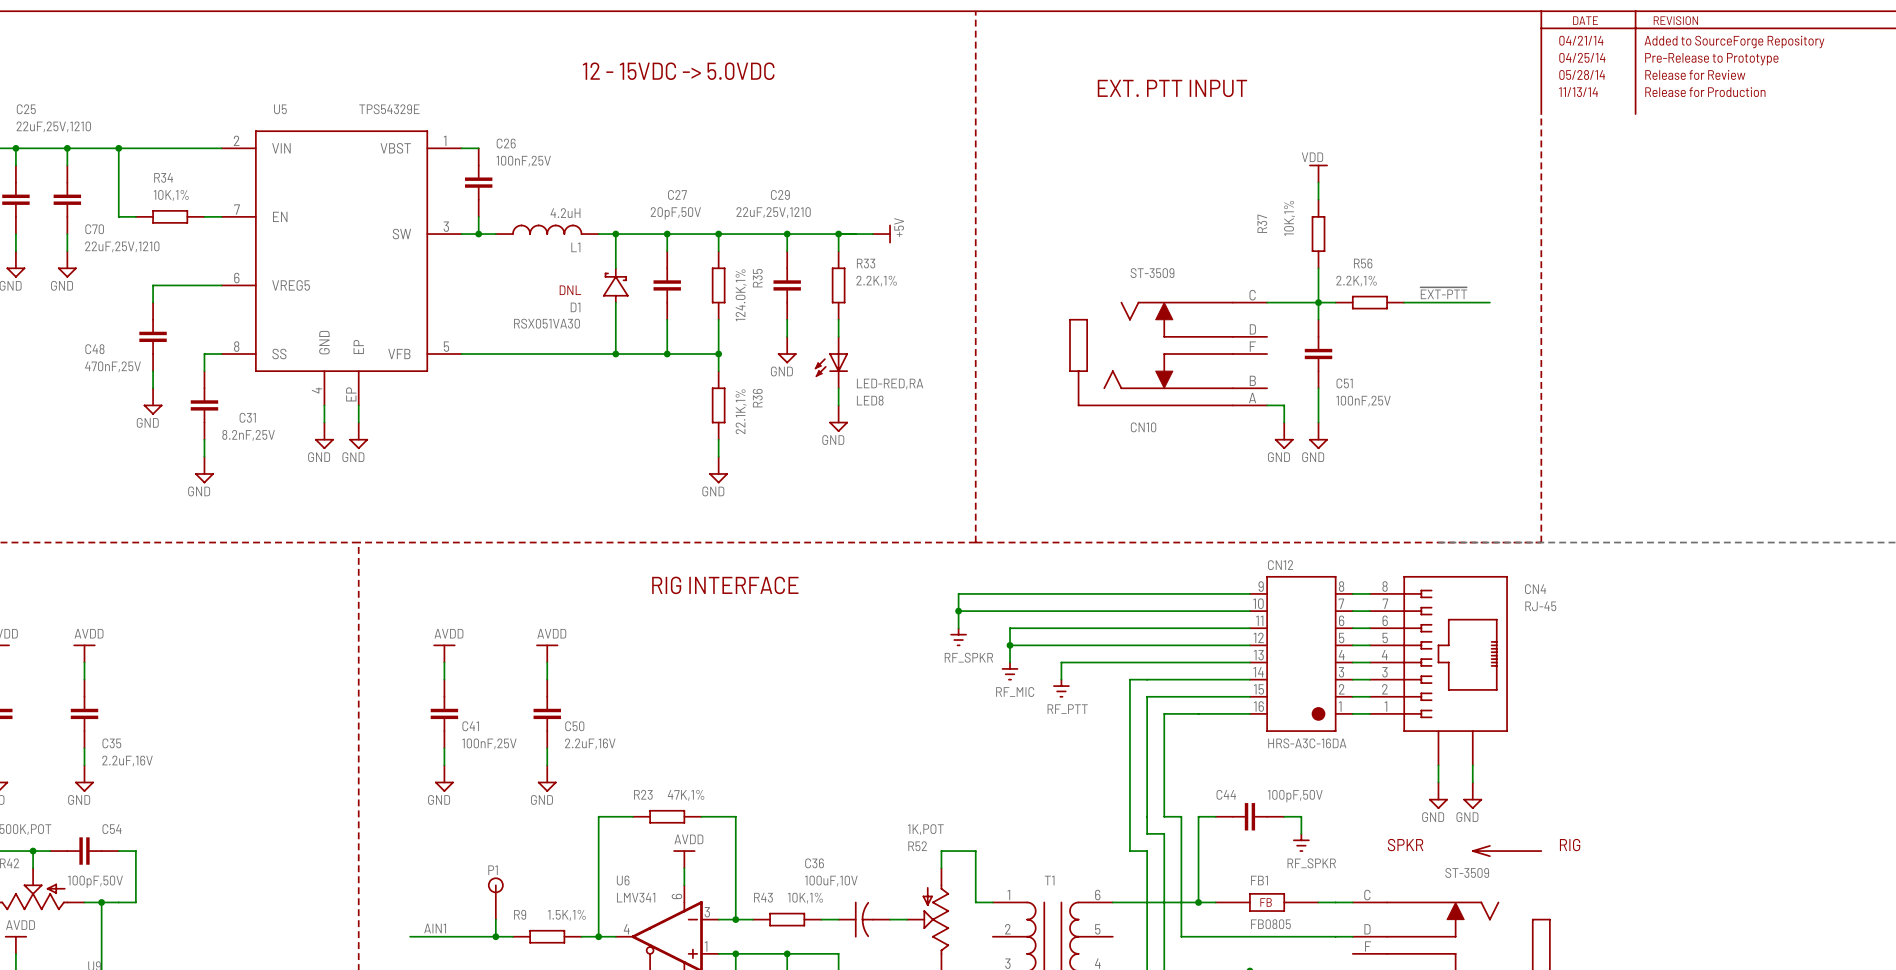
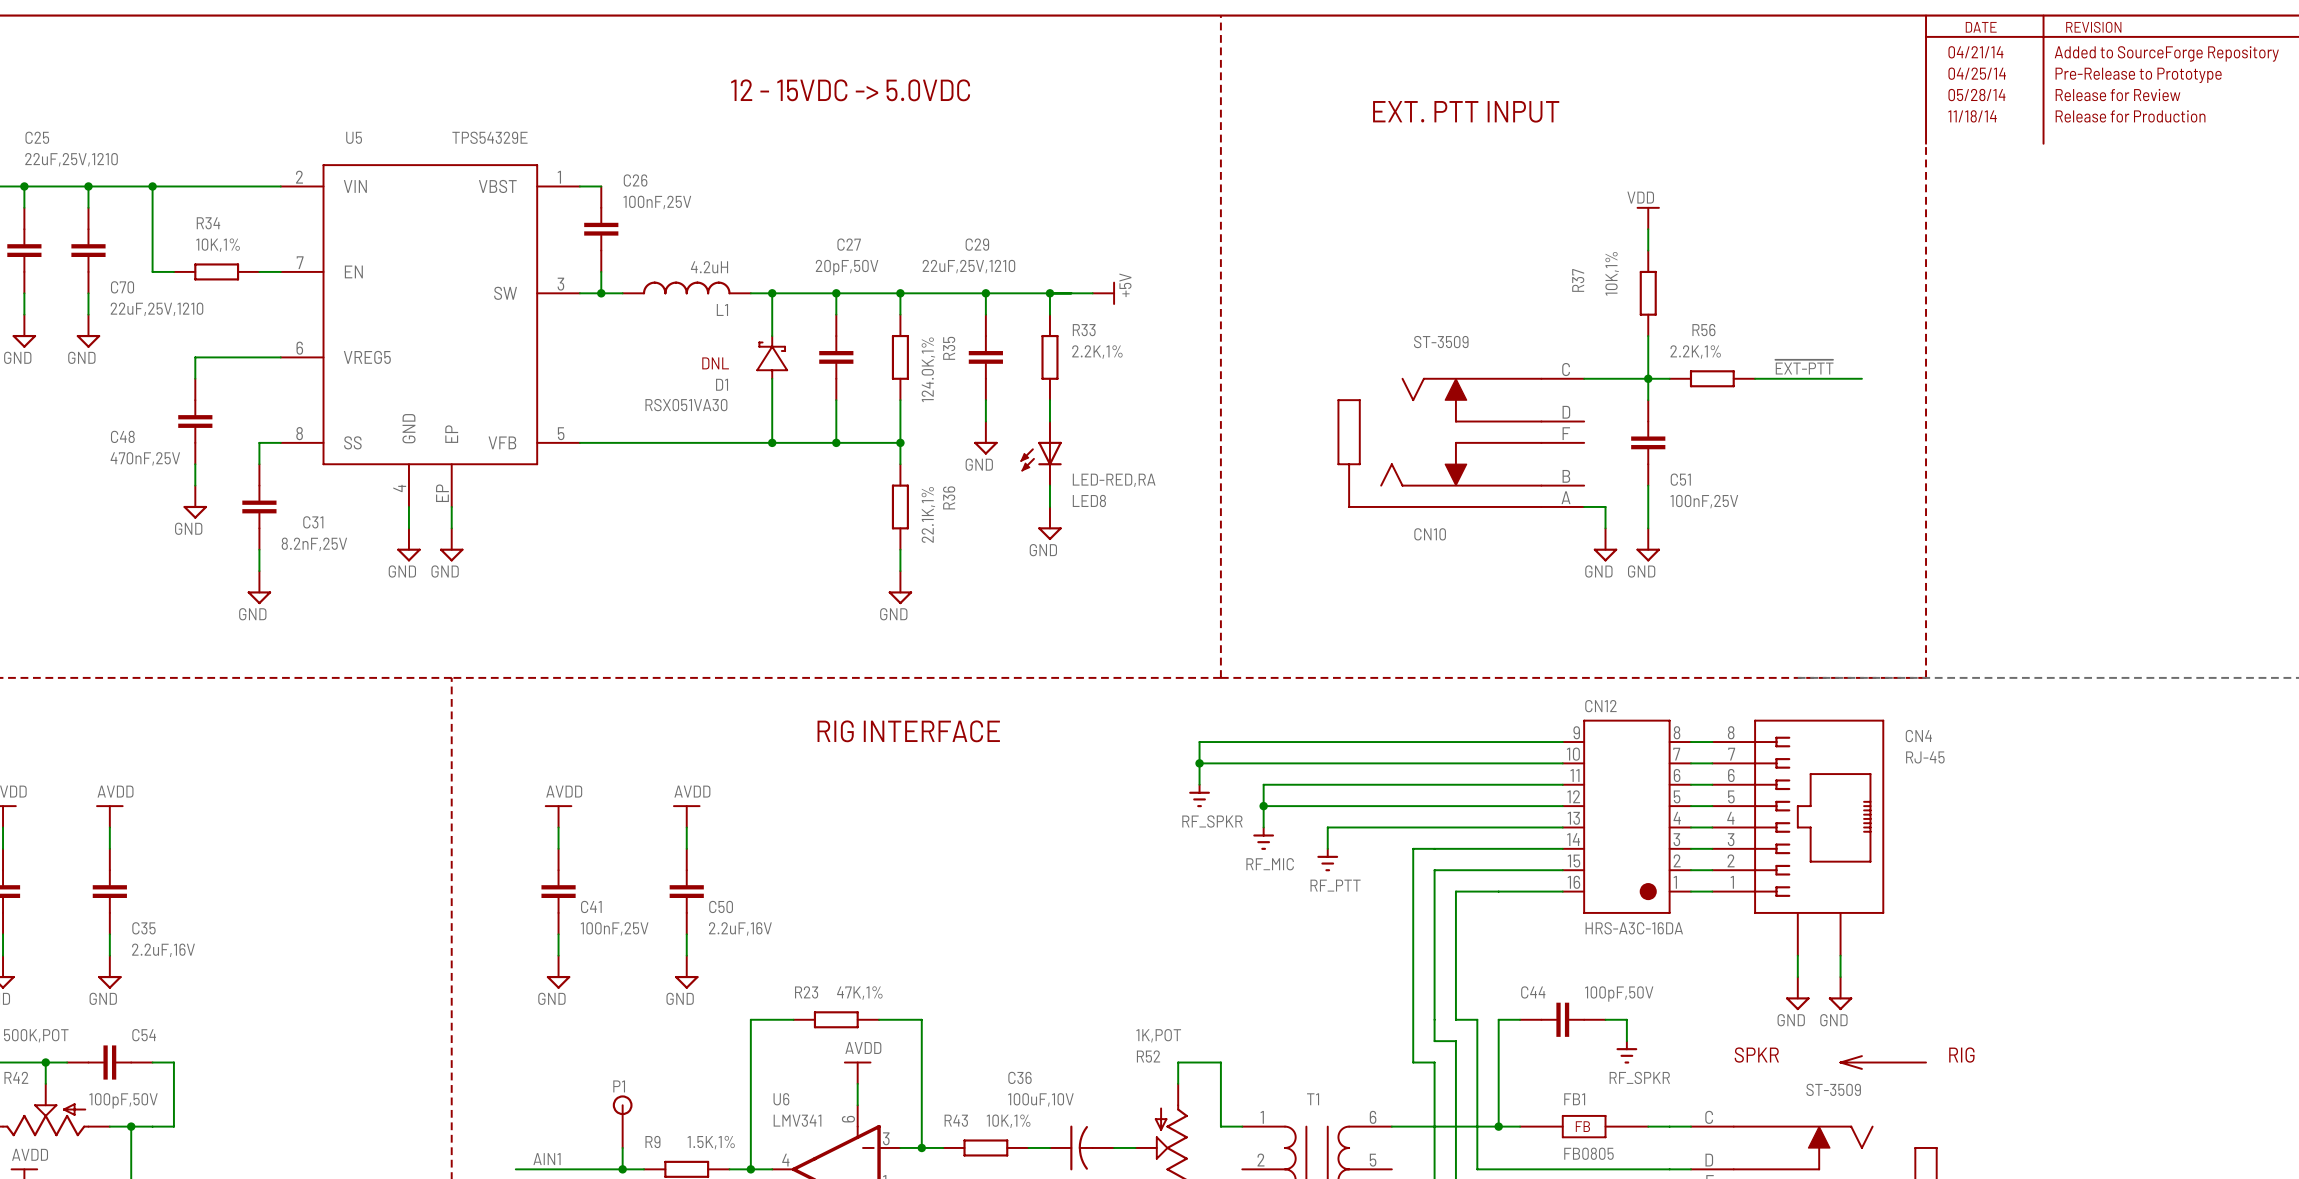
text: 11/13/14 (1578, 92) -> 11/18/14 (1972, 116)

